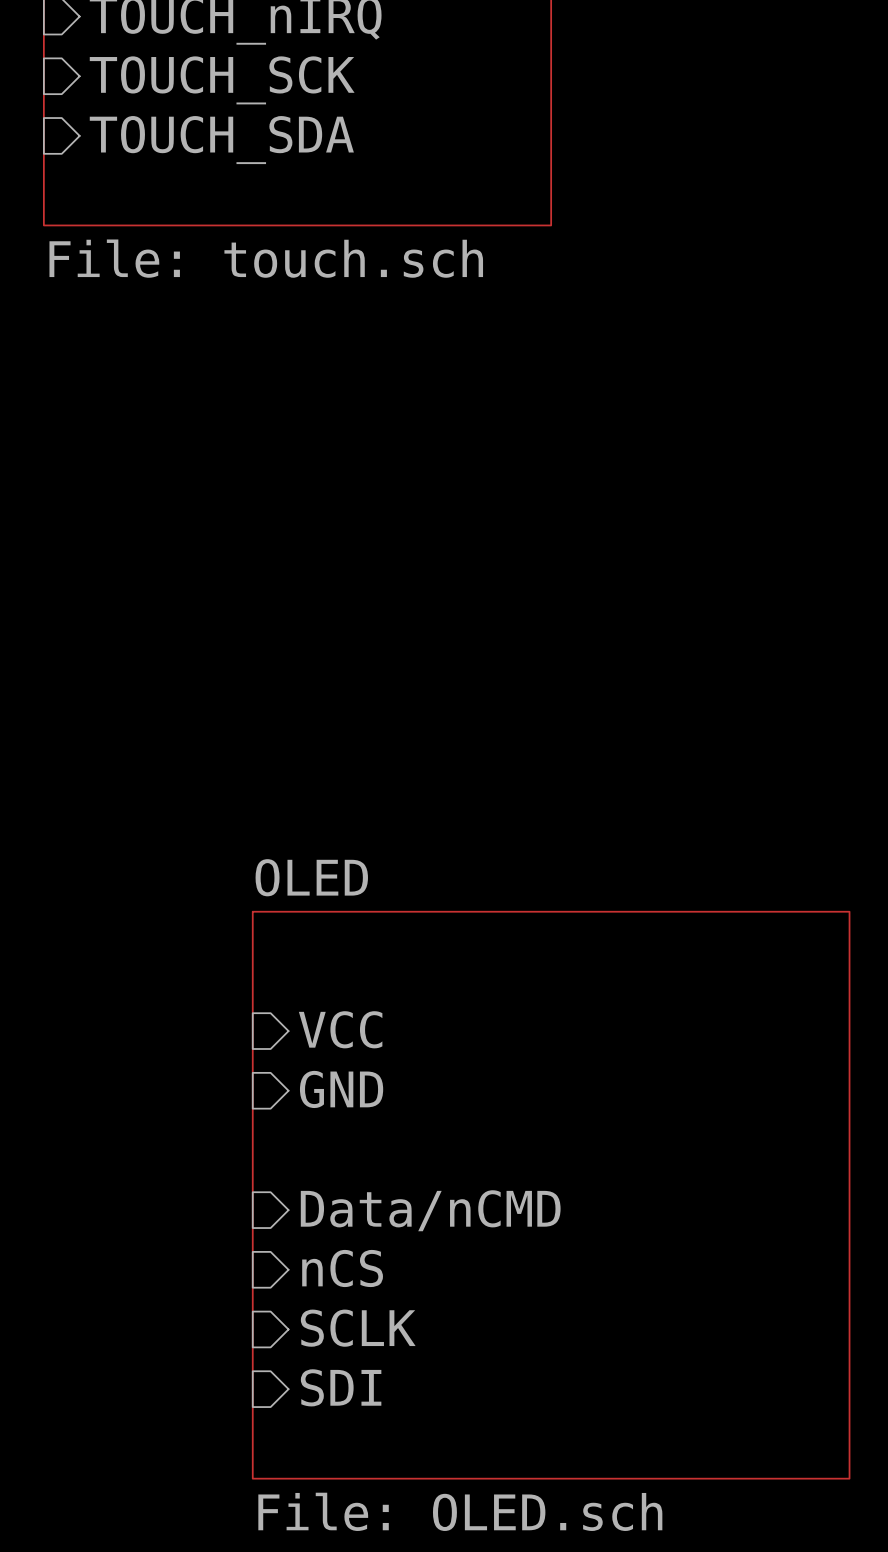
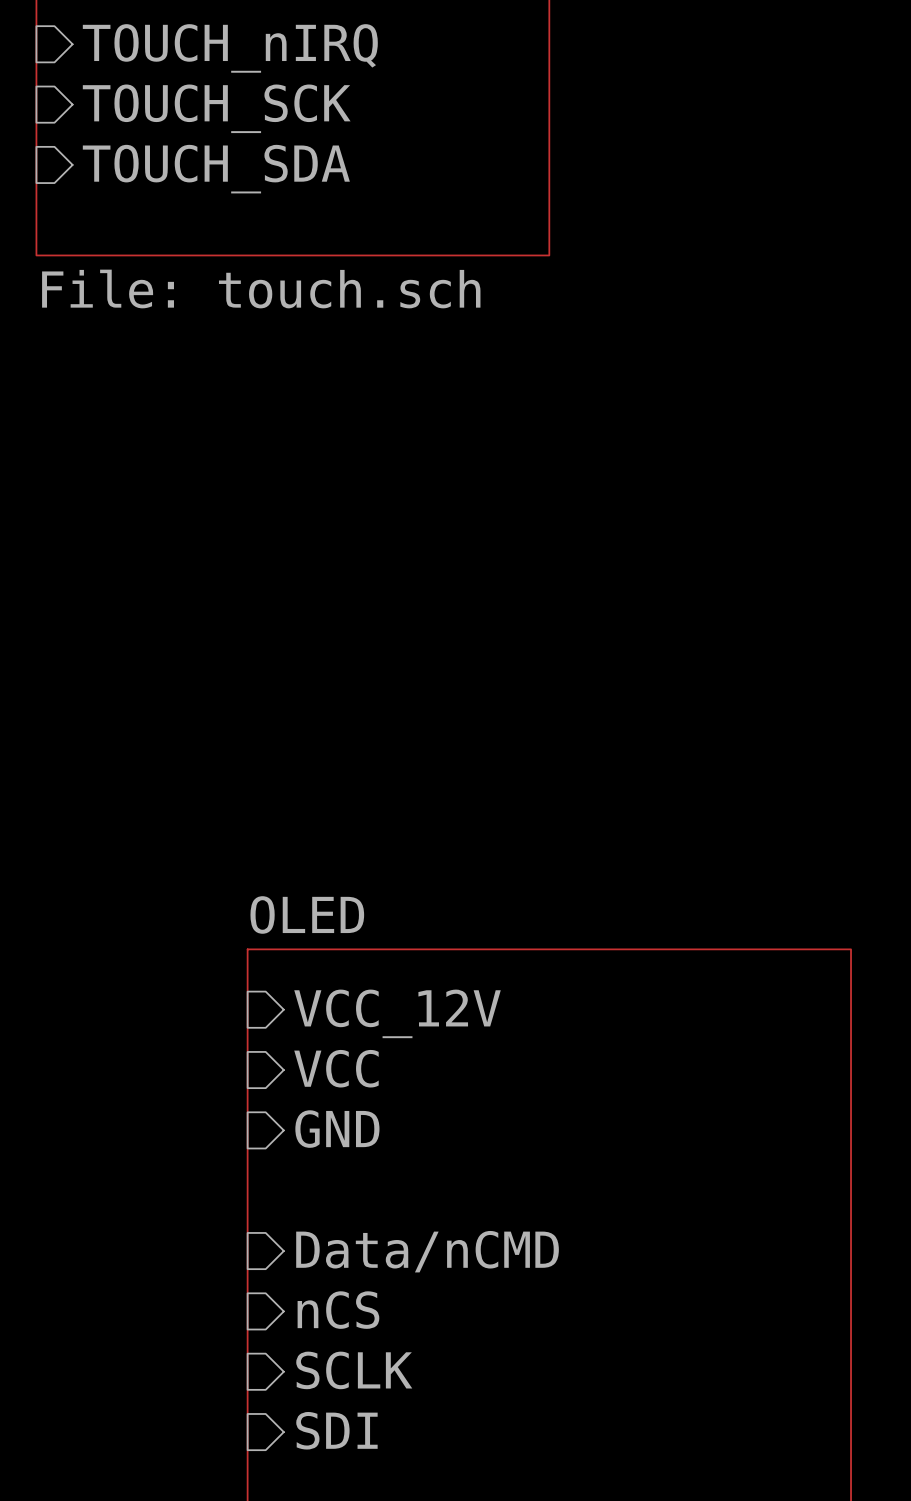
sheet pin: none -> VCC_12V (397, 1013)

